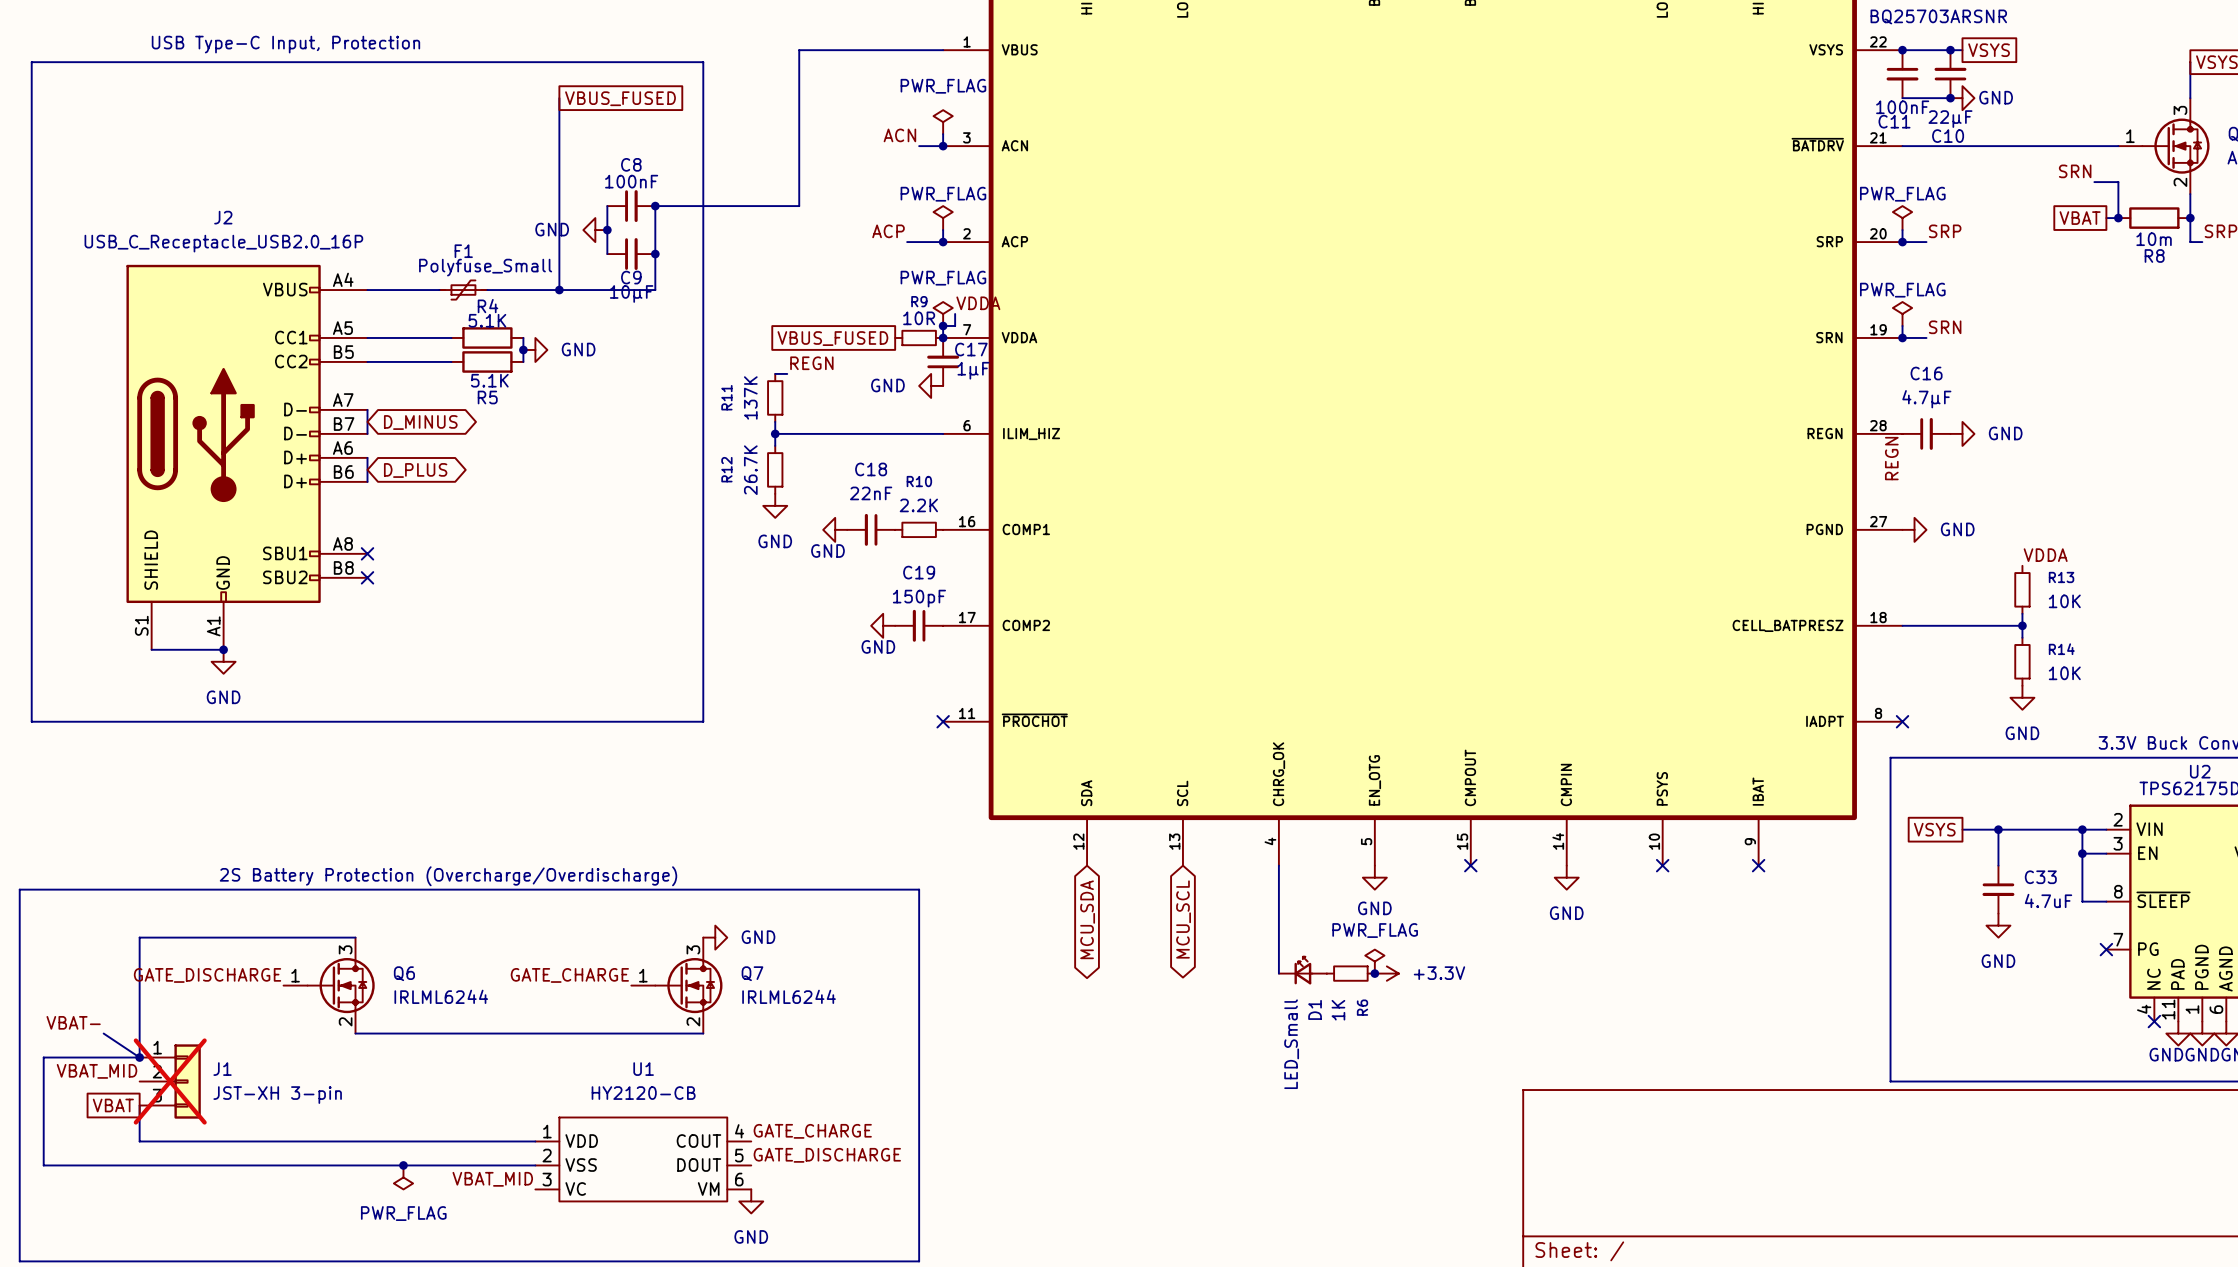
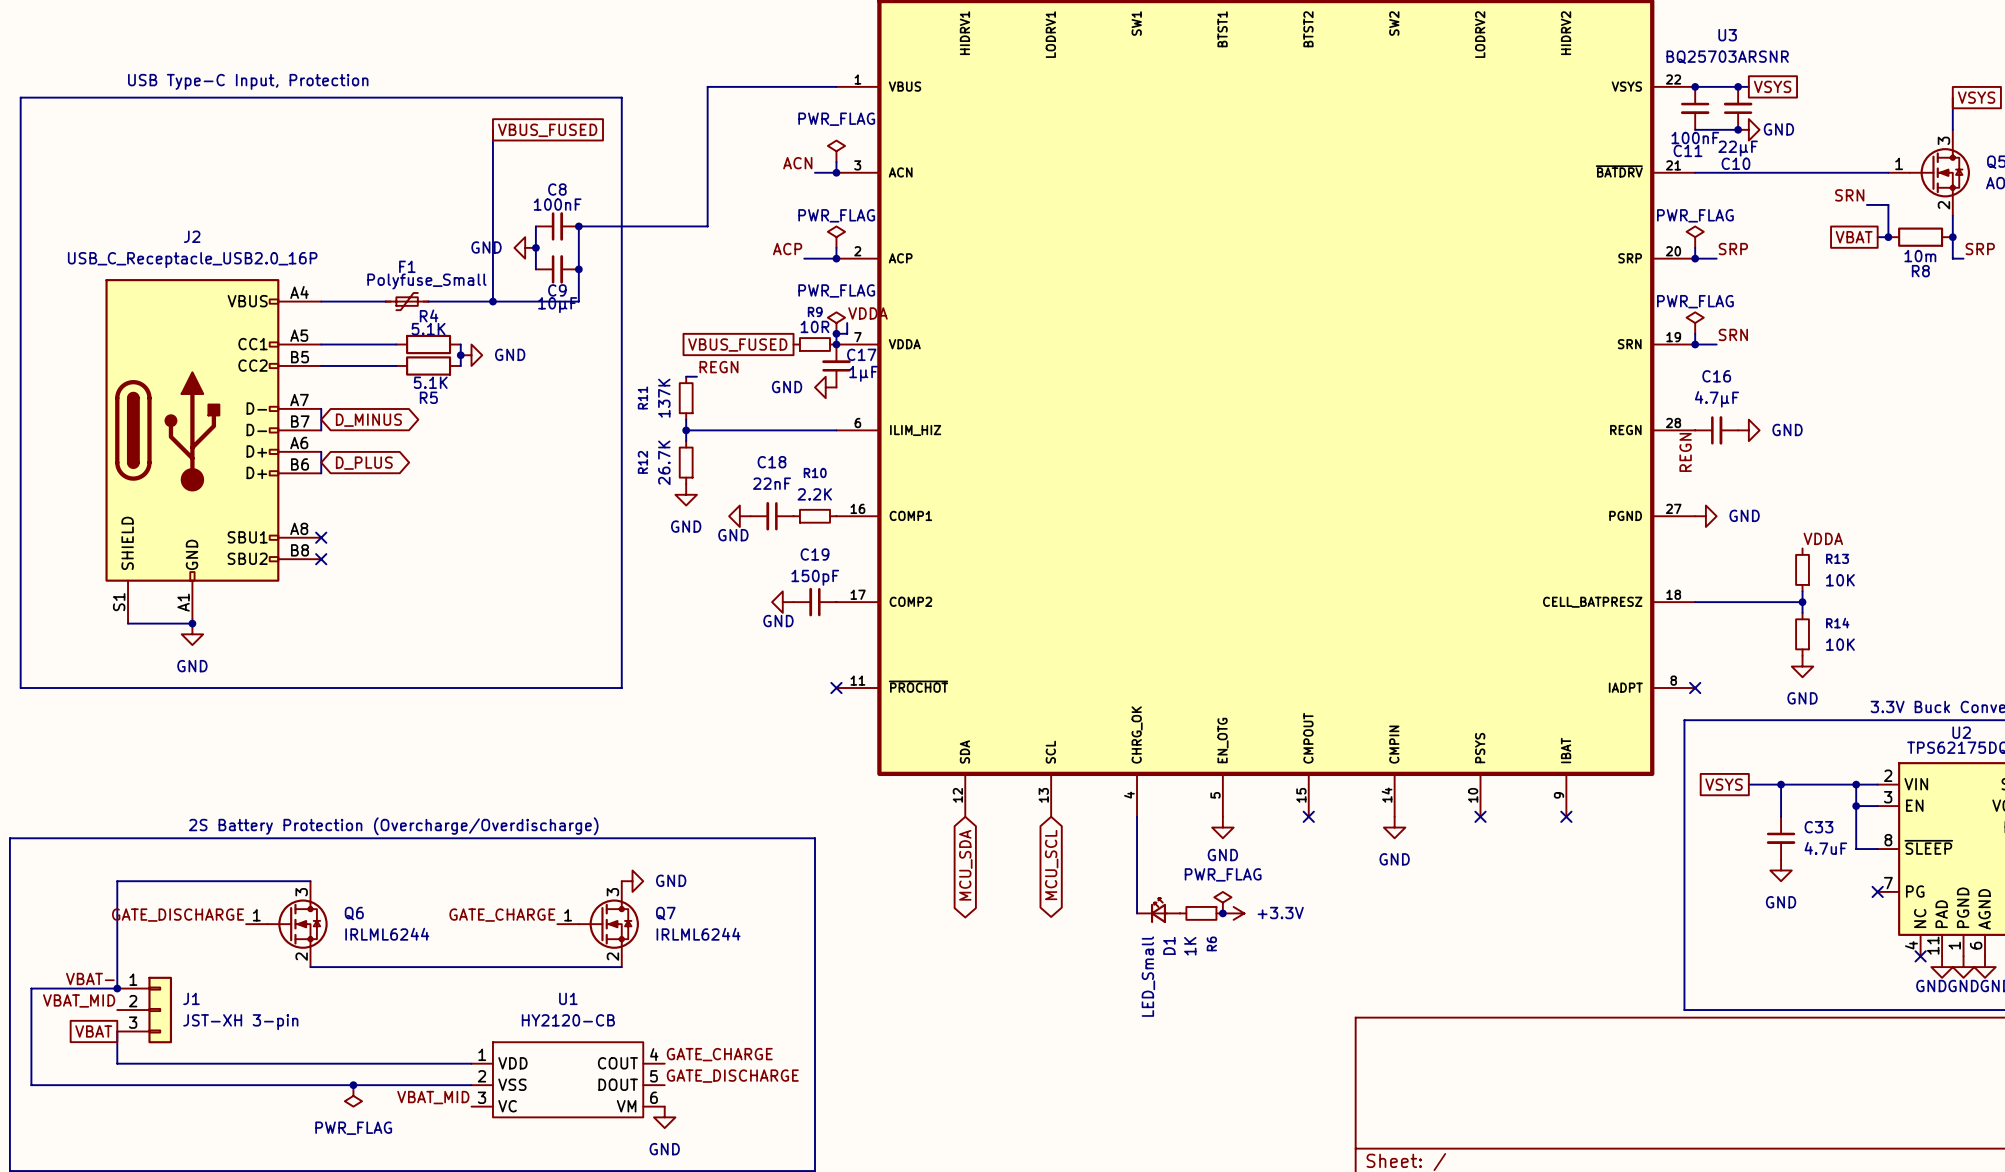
label position: VBAT- (73, 1022) -> VBAT- (90, 978)
wire: (103, 1033) (139, 1057) -> none
J1 do-not-place cross: (170, 1081) -> none

